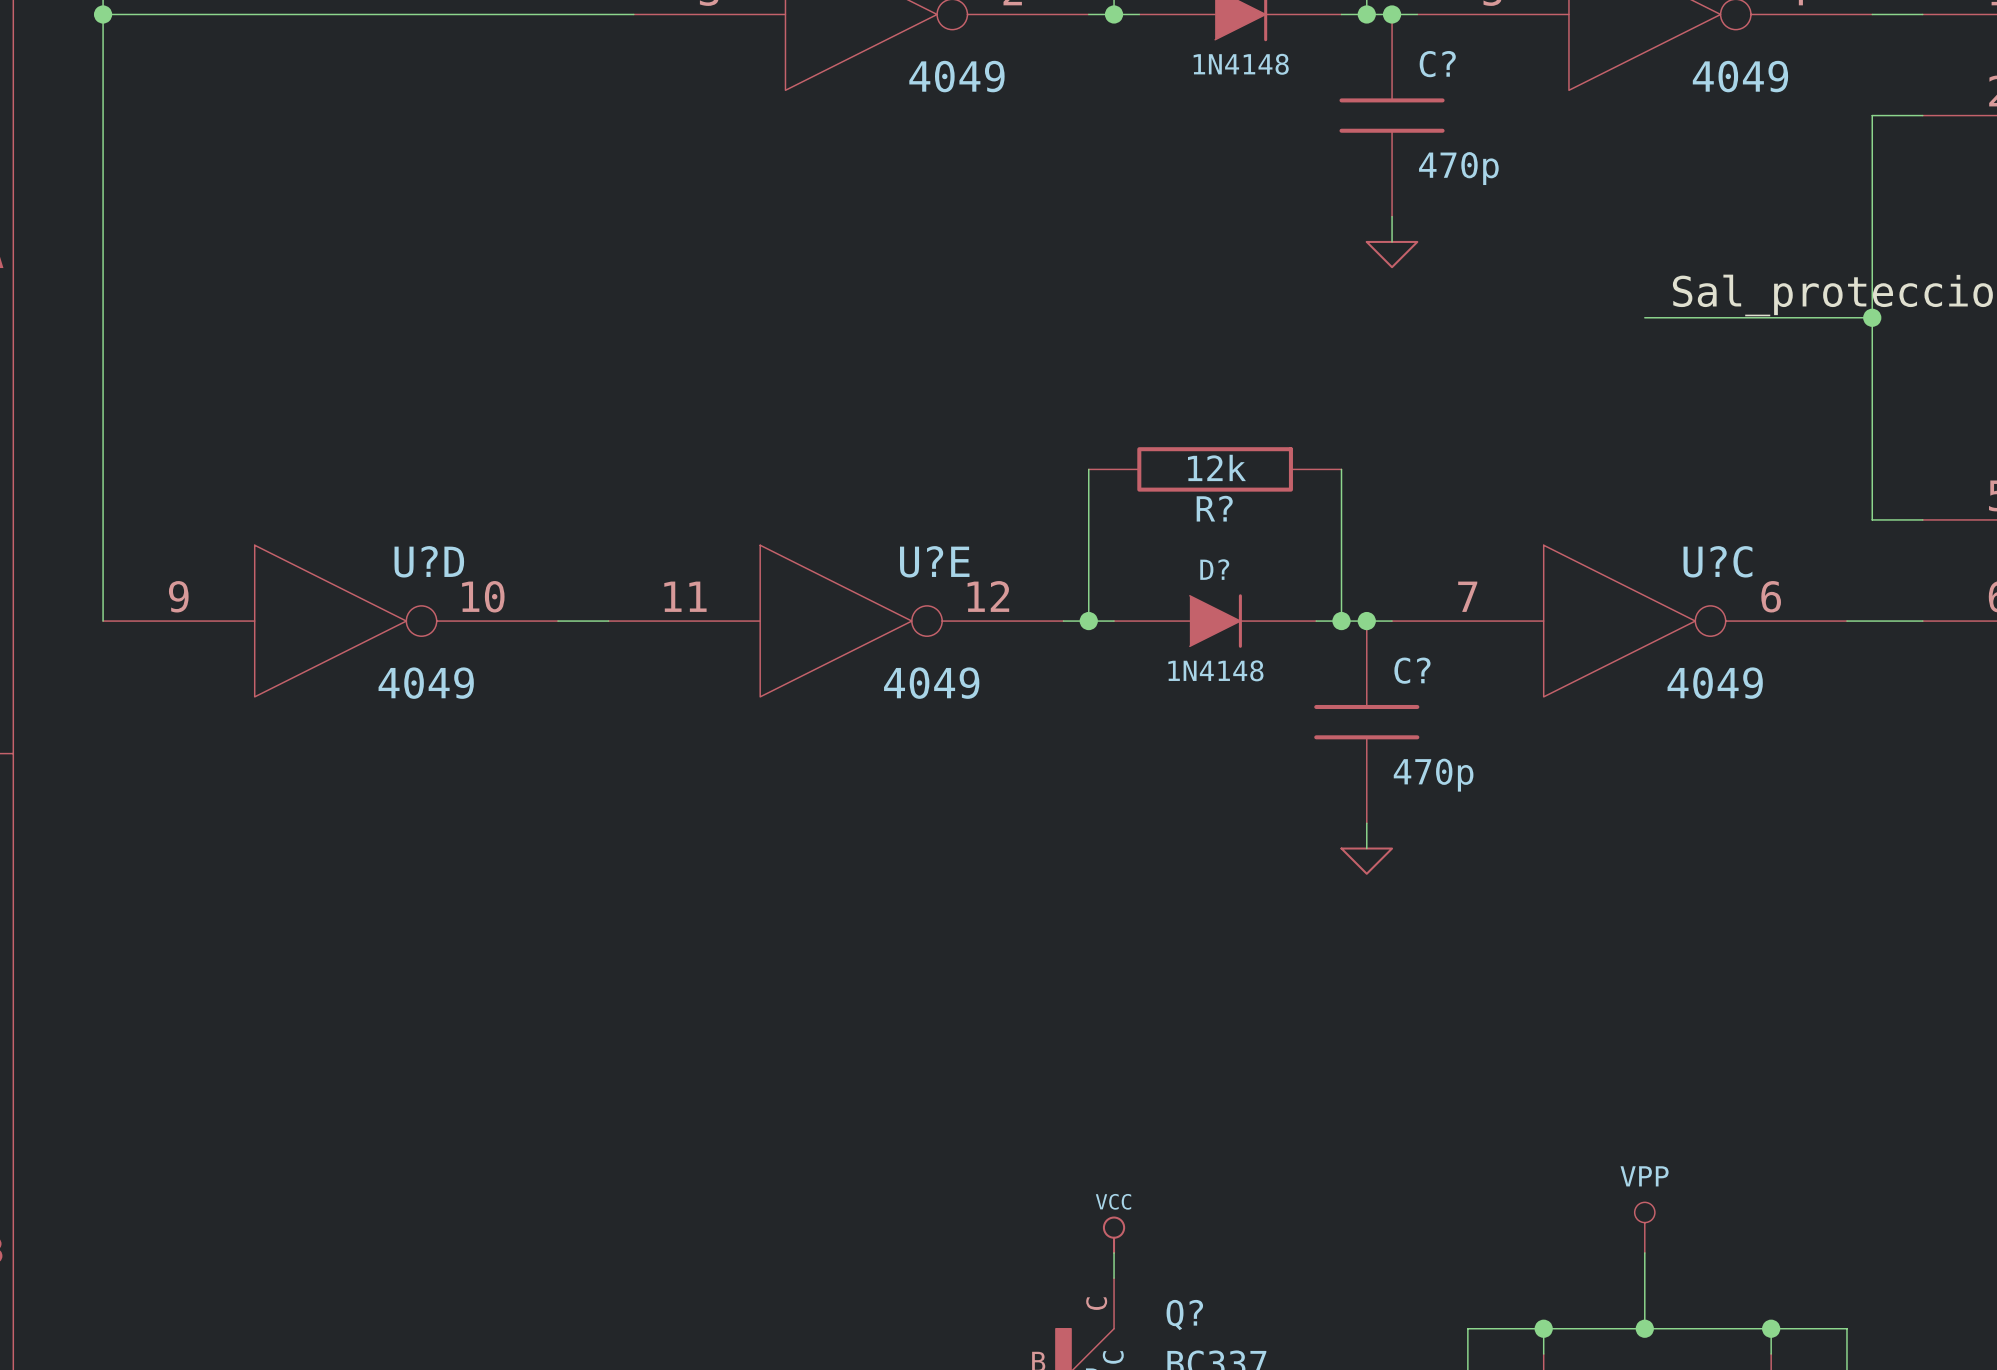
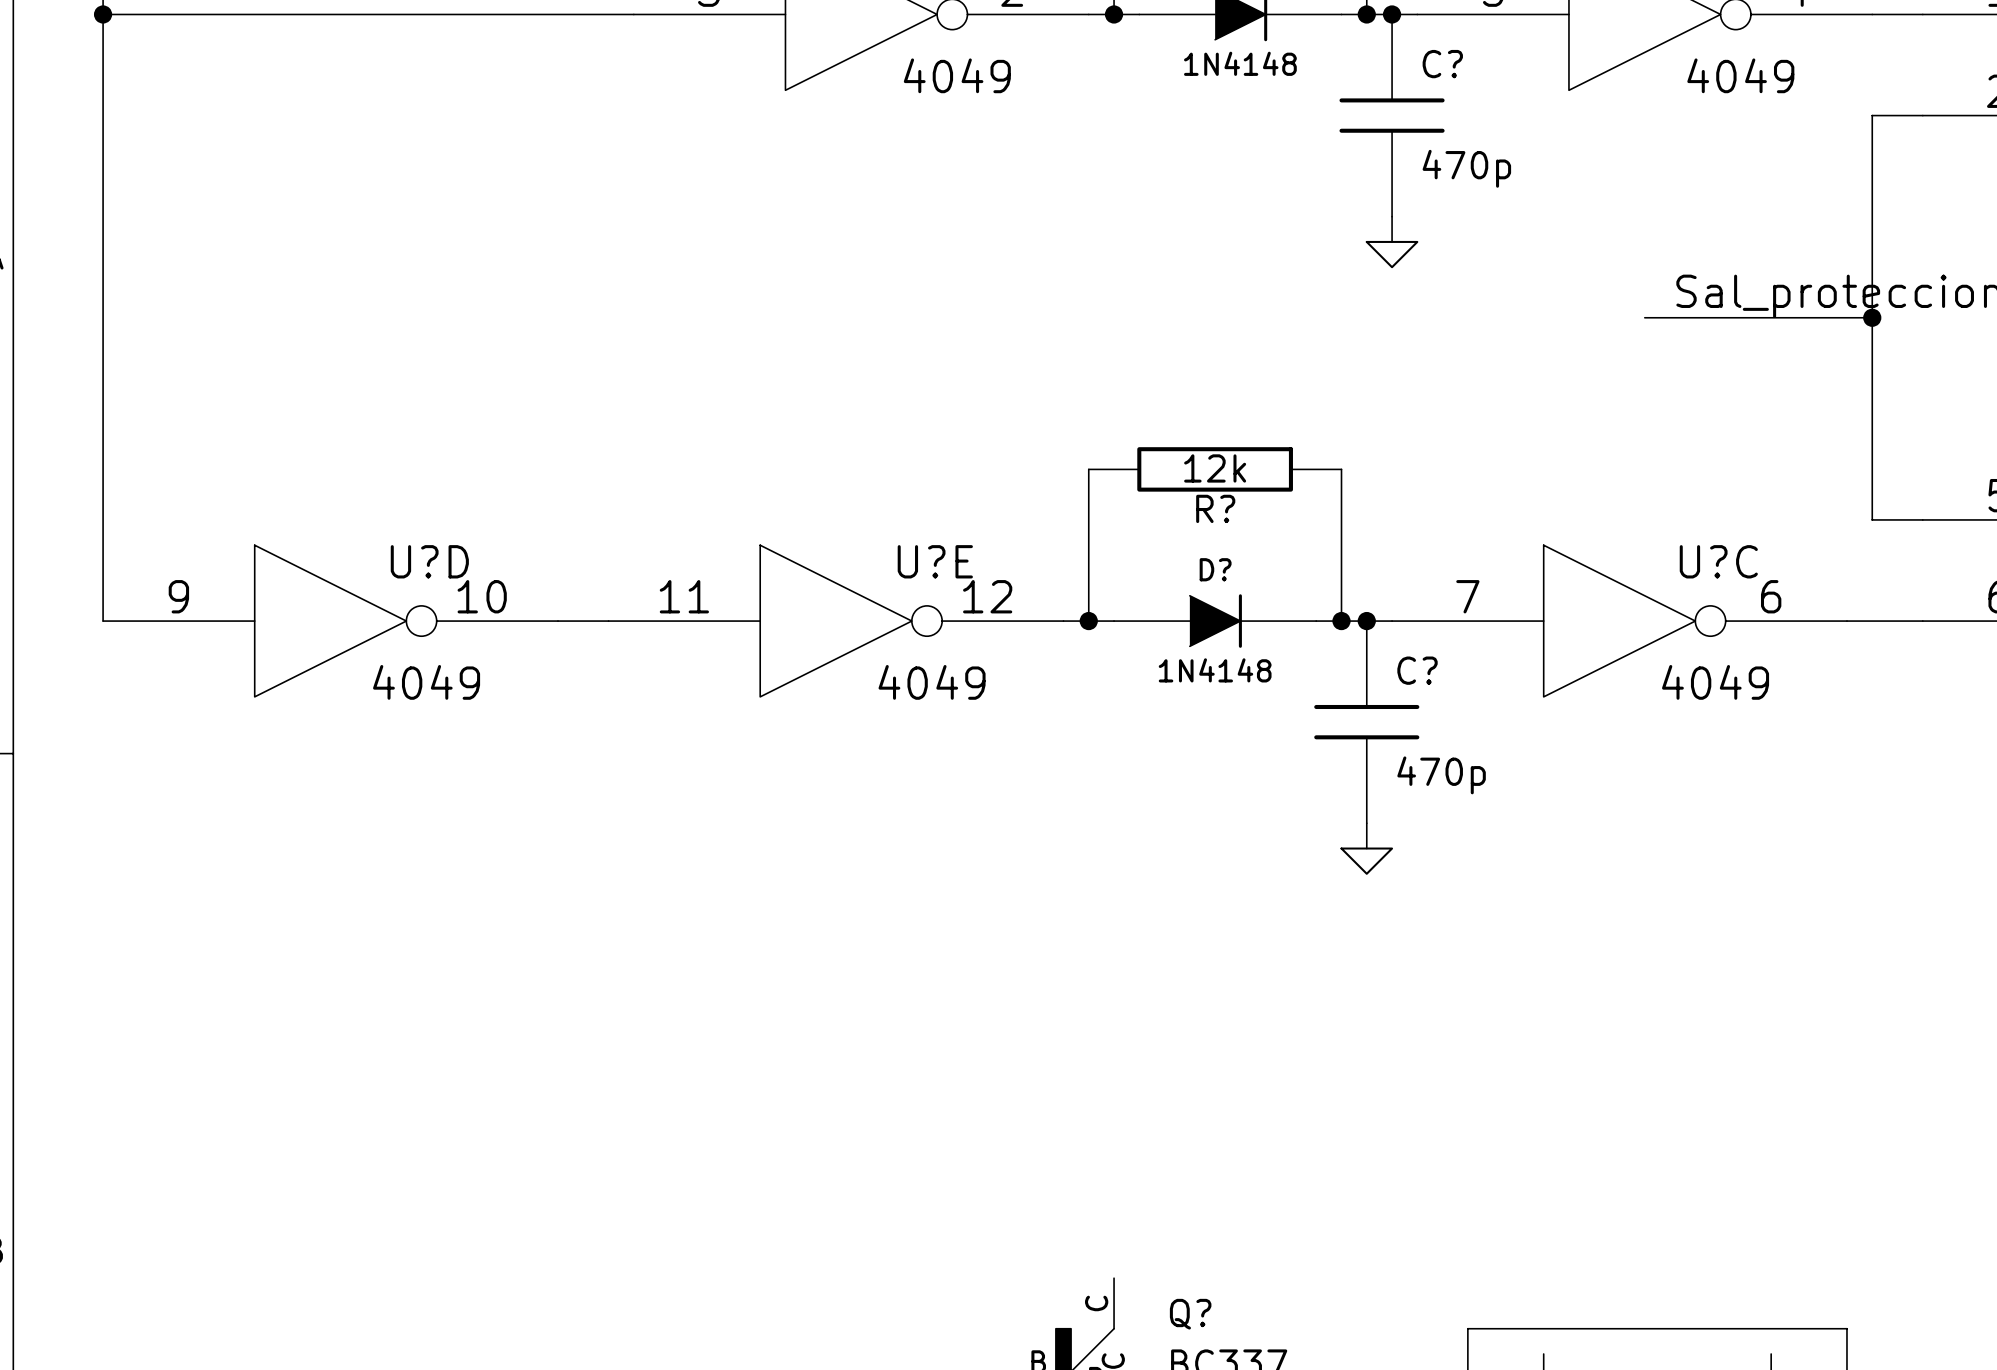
power symbol: VPP (1644, 1227) -> none
power symbol: VCC (1114, 1235) -> none
wire: (1114, 1252) (1114, 1278) -> none
wire: (1644, 1252) (1644, 1328) -> none
wire: (1543, 1328) (1543, 1354) -> none
junction: (1543, 1328) -> none
junction: (1644, 1328) -> none
wire: (1771, 1328) (1771, 1354) -> none
junction: (1771, 1328) -> none

